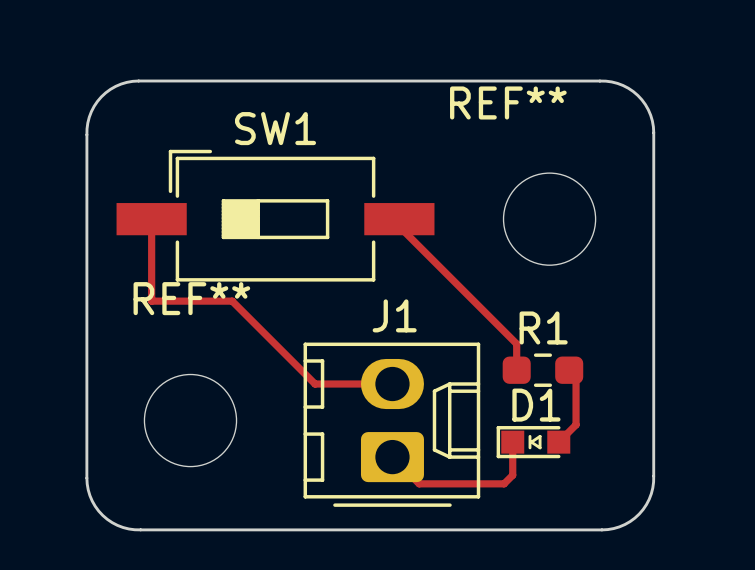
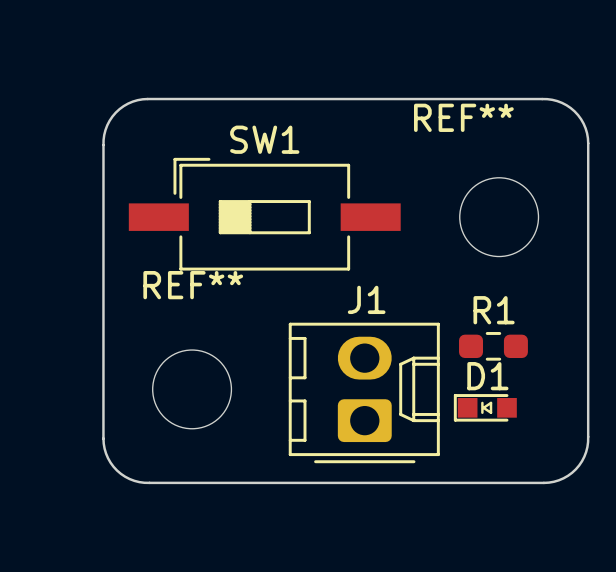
track: (151, 219) (151, 301) (232, 301) (315, 384) (392, 384) -> none
track: (399, 219) (399, 226) (516, 343) (516, 370) -> none
track: (569, 370) (576, 377) (576, 424) (558, 442) -> none
track: (512, 442) (512, 475) (504, 483) (419, 483) (392, 457) -> none

